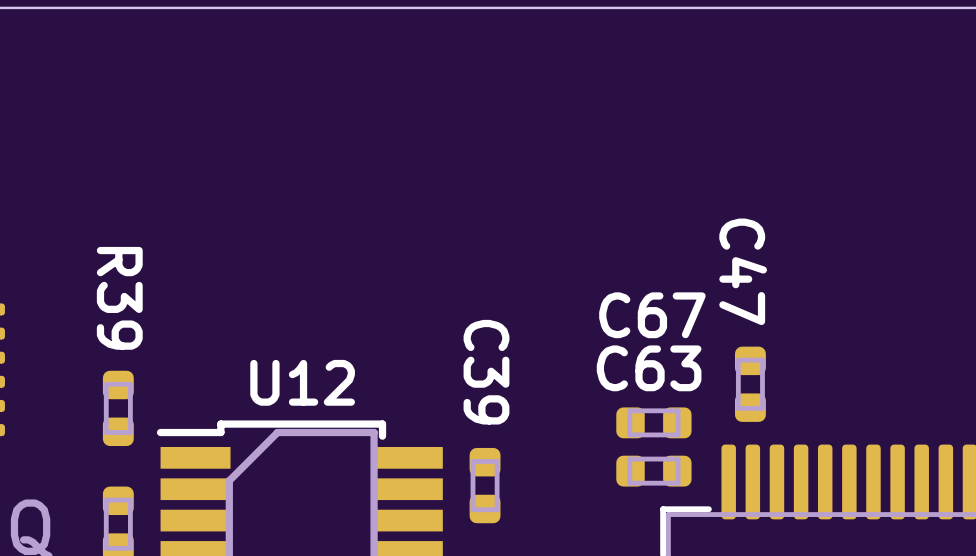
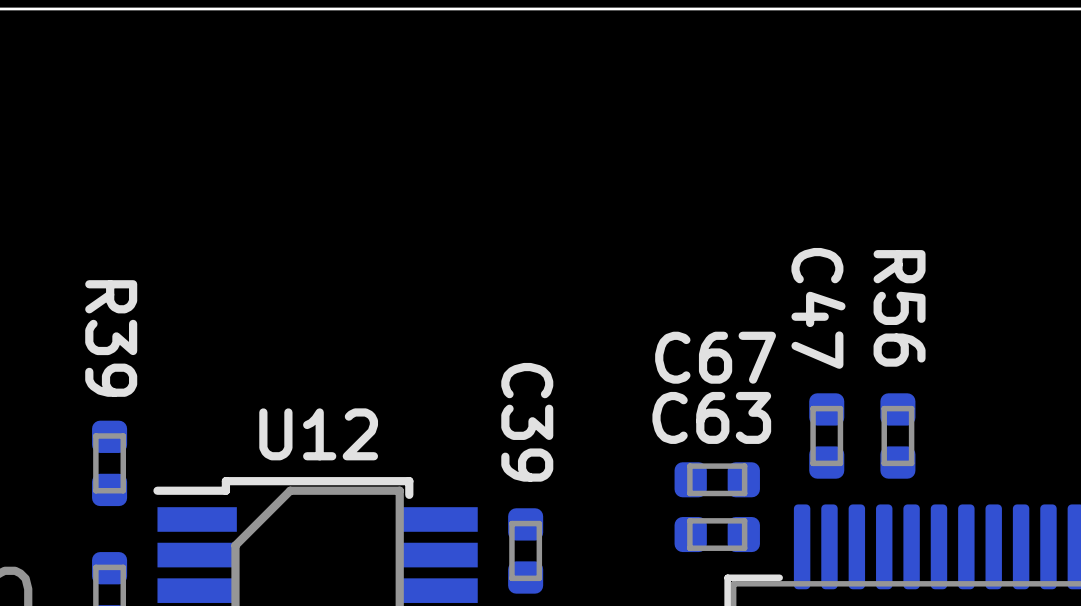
R56: none -> (897, 435)

